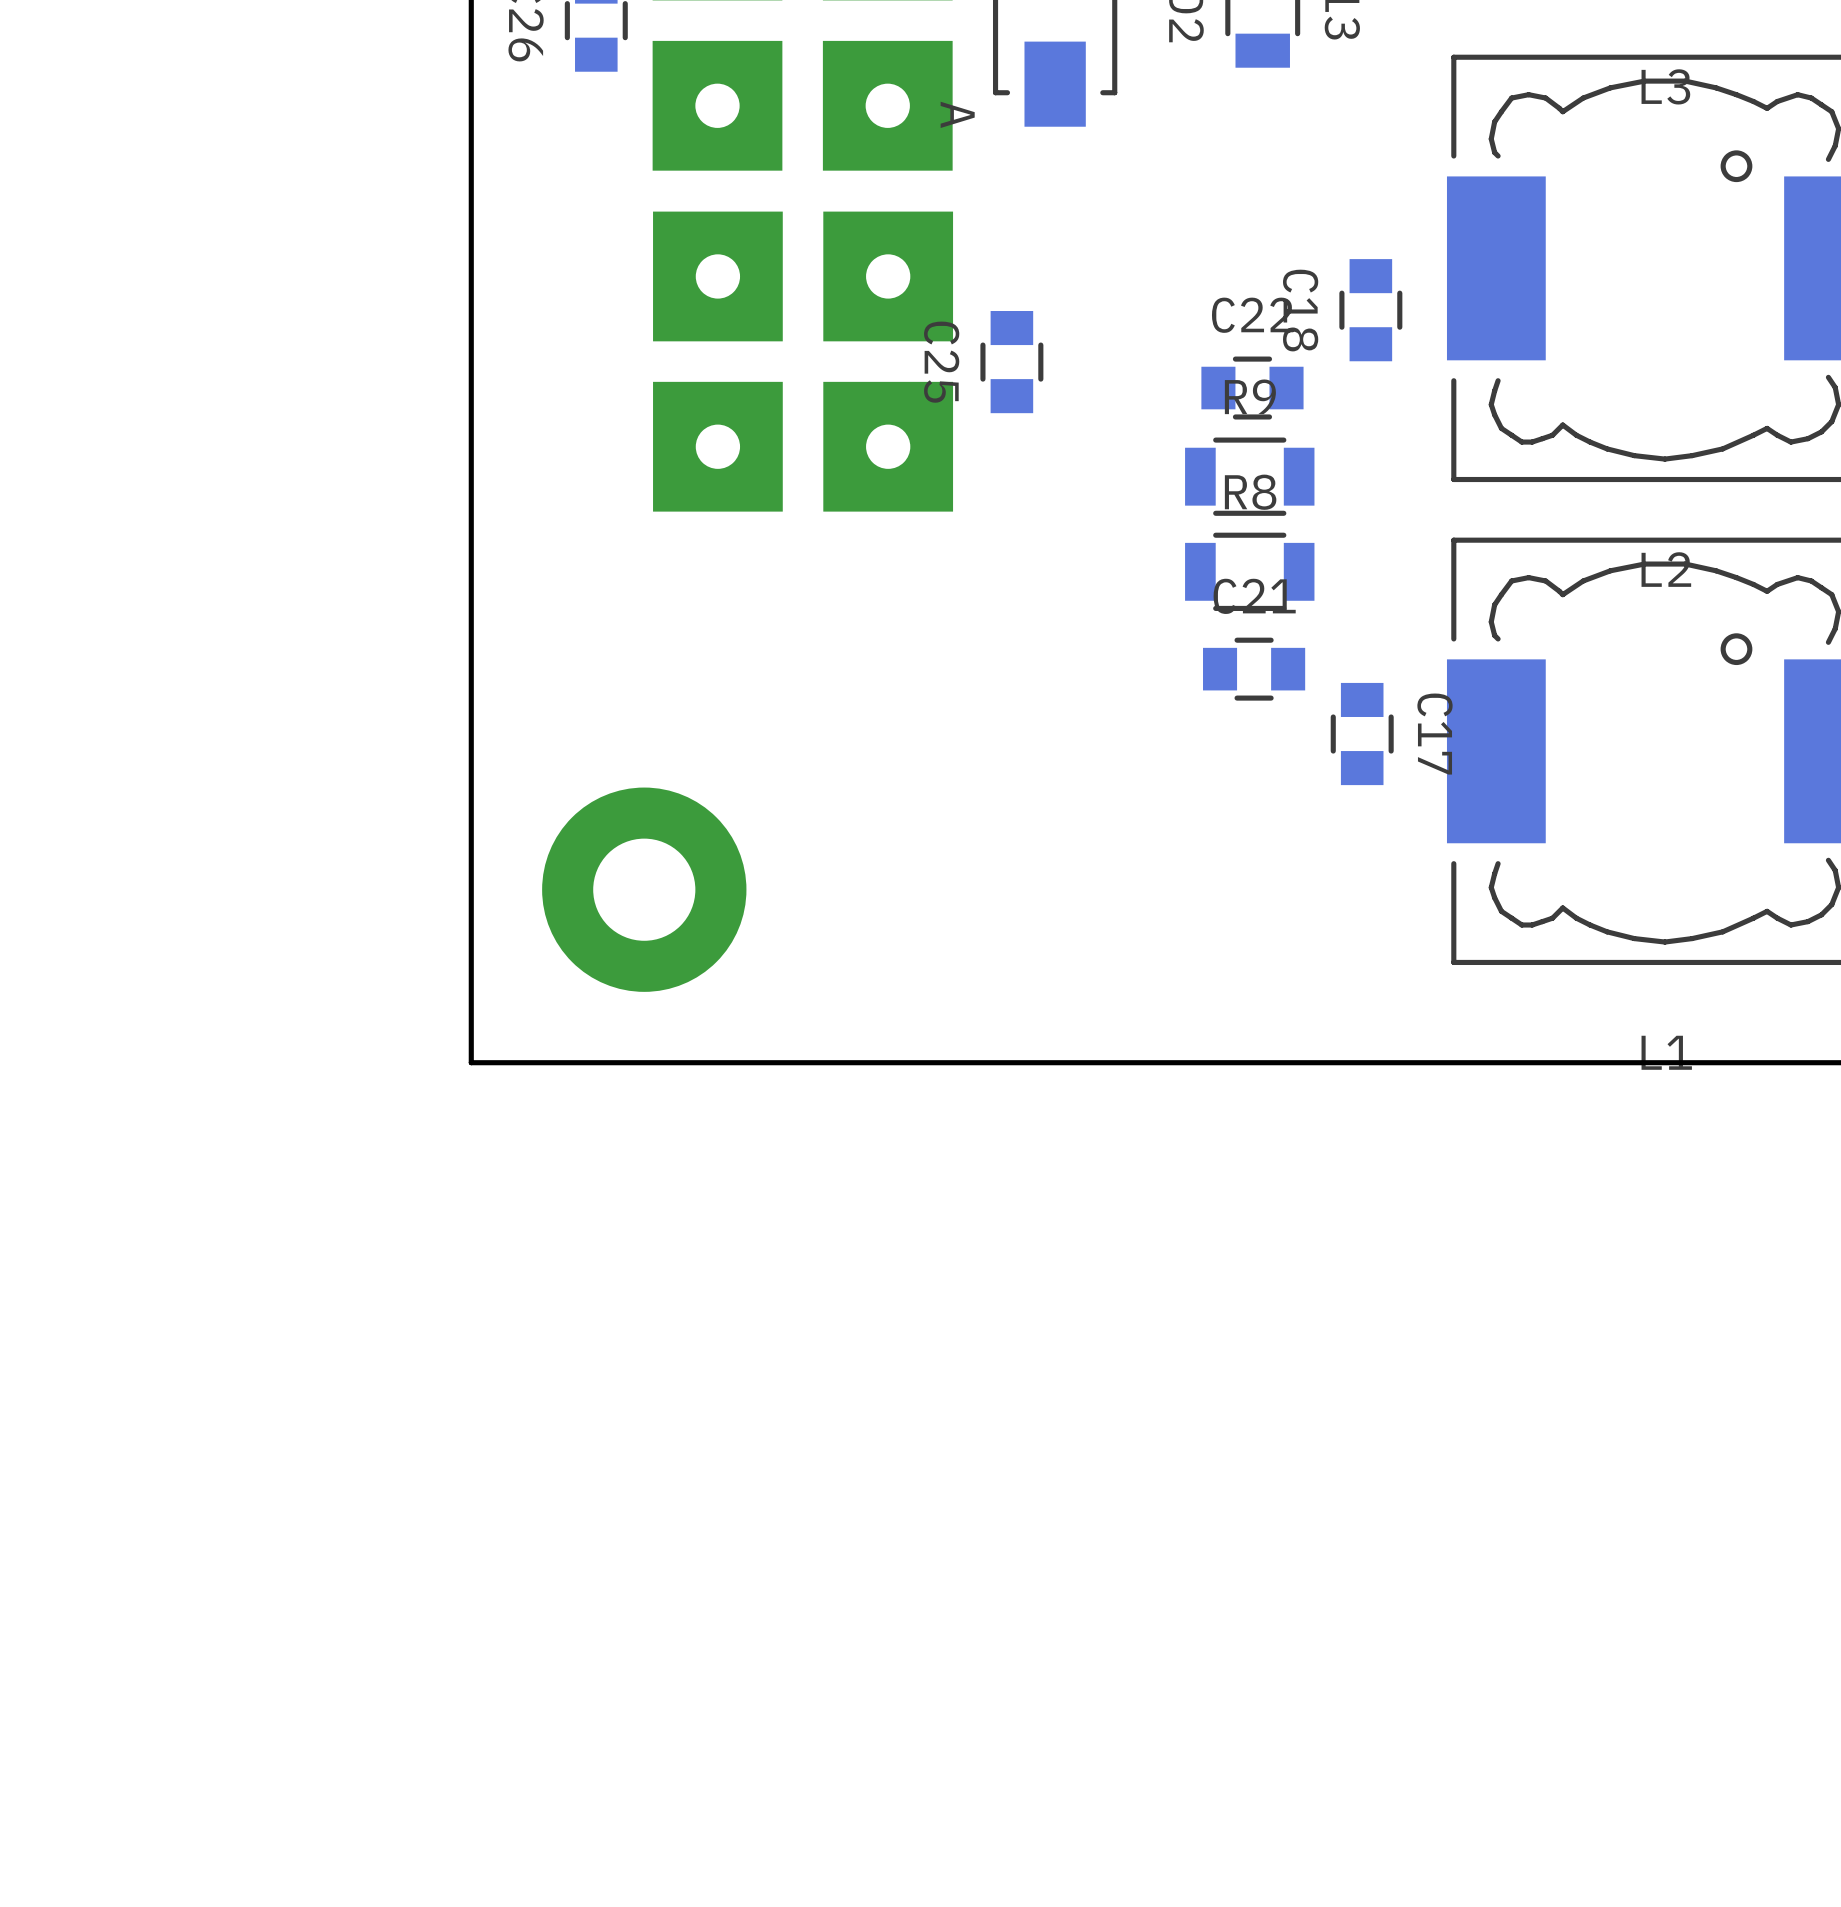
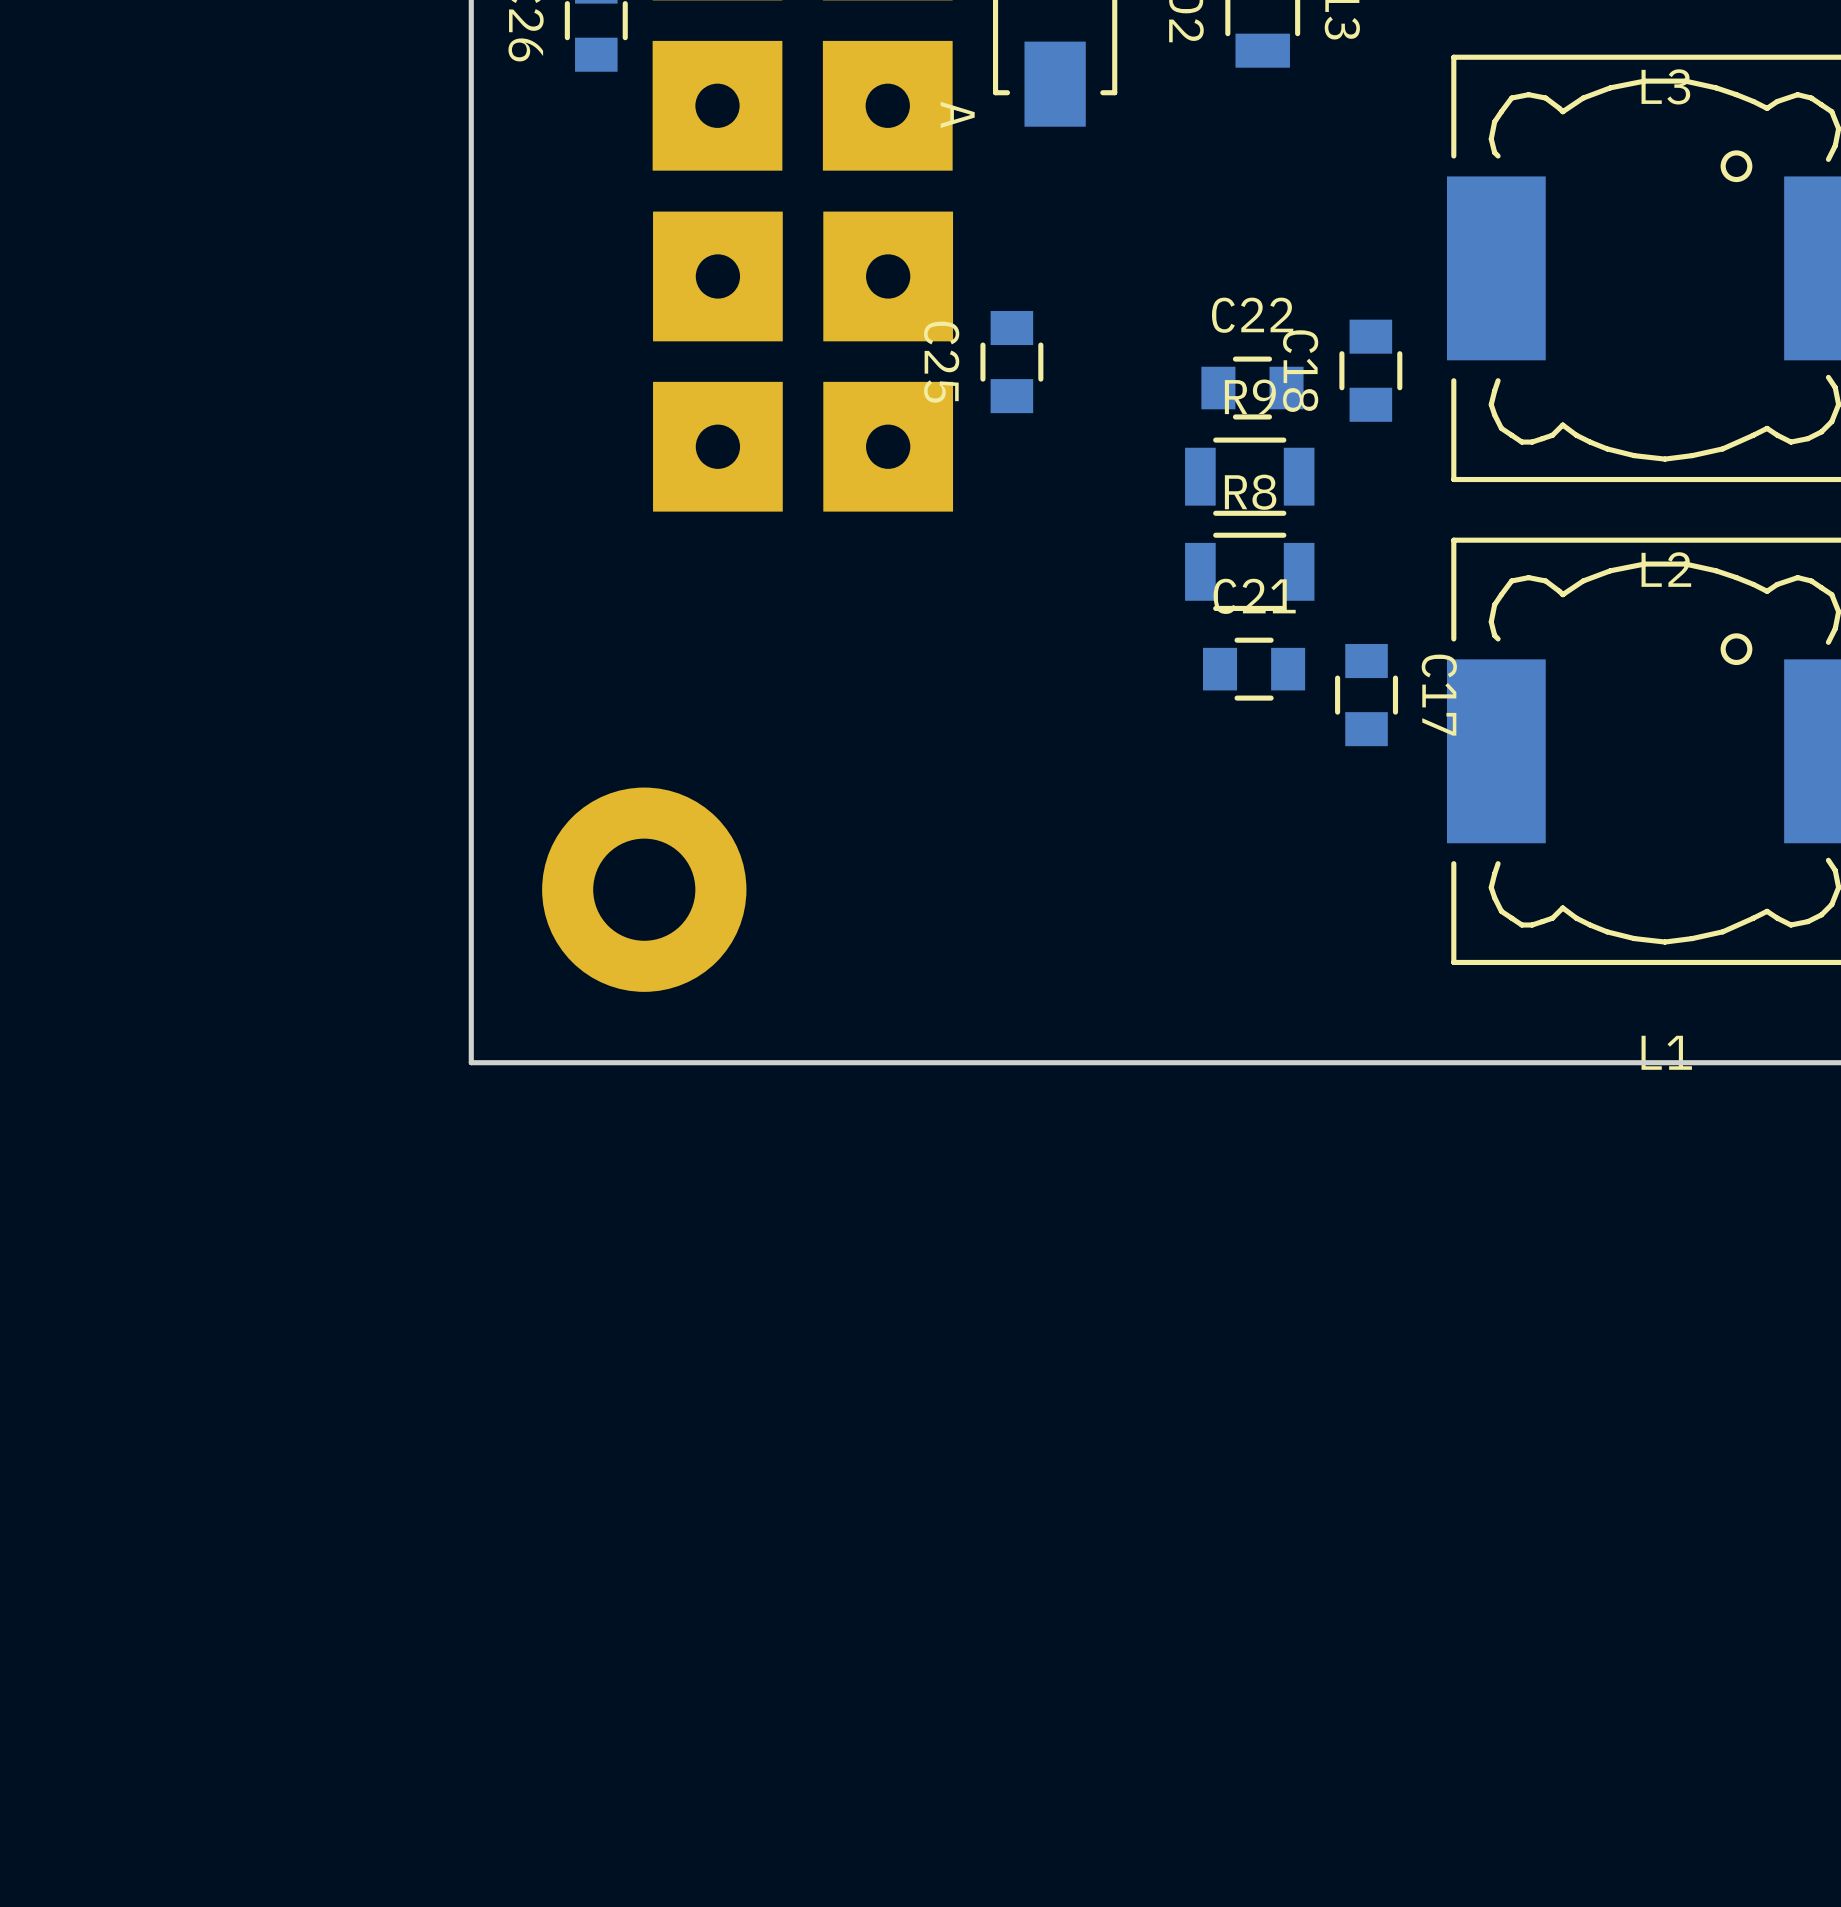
C18 position: (1370, 310) -> (1370, 370)
C17 position: (1362, 734) -> (1366, 695)

